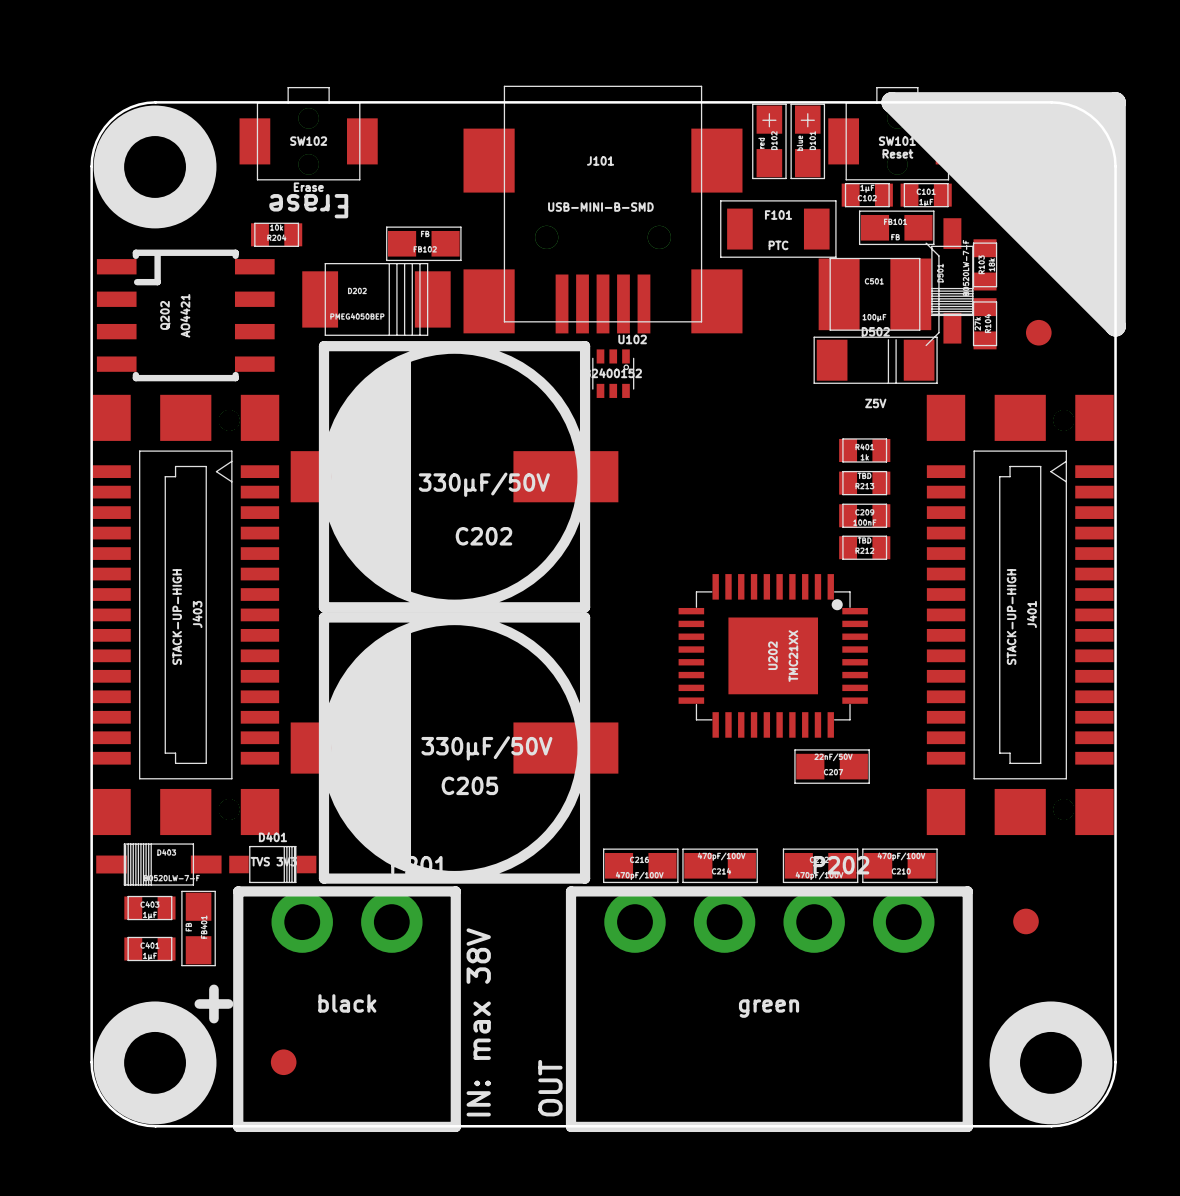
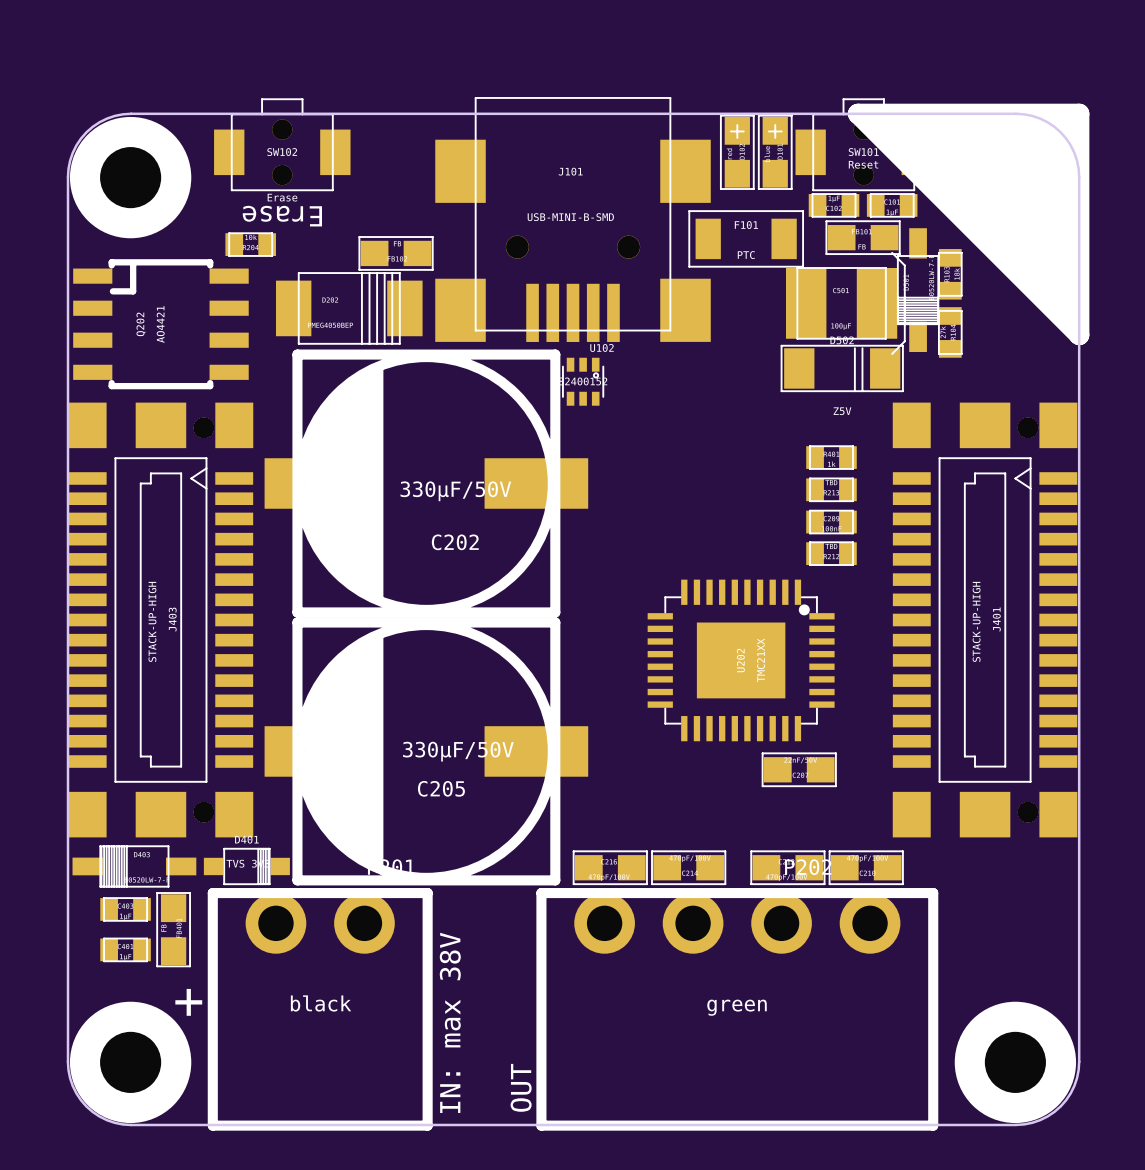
part: (1038, 332) -> none
part: (1025, 921) -> none
part: (283, 1062) -> none

